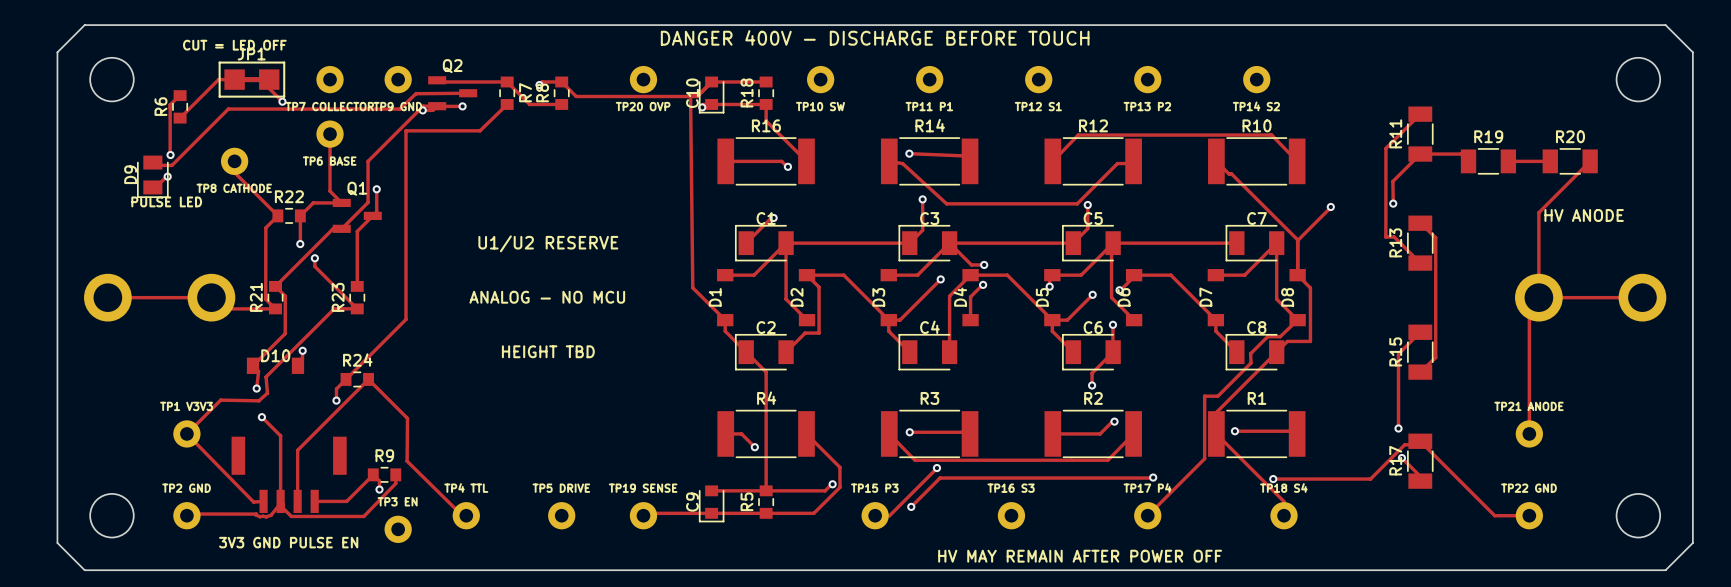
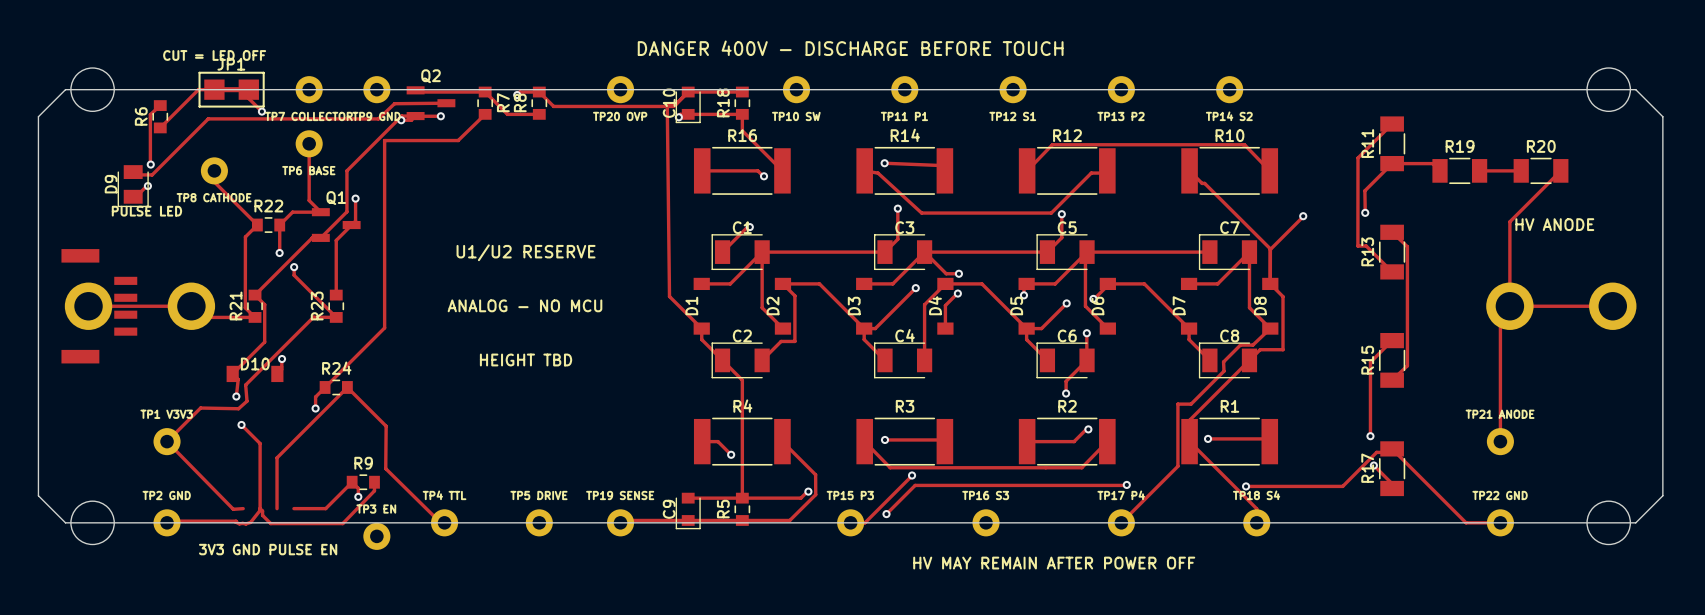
board edge: (57, 106) (57, 52) (84, 25) (1665, 25) (1692, 52) (1692, 106) -> (38, 116) (65, 89) (1635, 89) (1662, 116)
part rotation: 0° (289, 474) -> 90° counterclockwise (99, 306)
part position: (289, 474) -> (99, 306)
board edge: (57, 488) (57, 542) (84, 570) (1665, 570) (1692, 542) (1692, 488) -> (38, 495) (65, 522) (1635, 522) (1662, 495)

